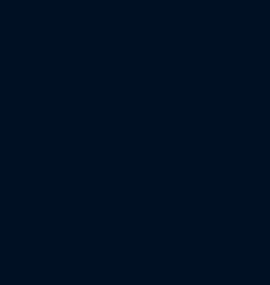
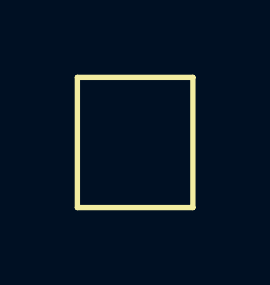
line: none -> (77, 77) (192, 77) (192, 207) (77, 207) (77, 77)

